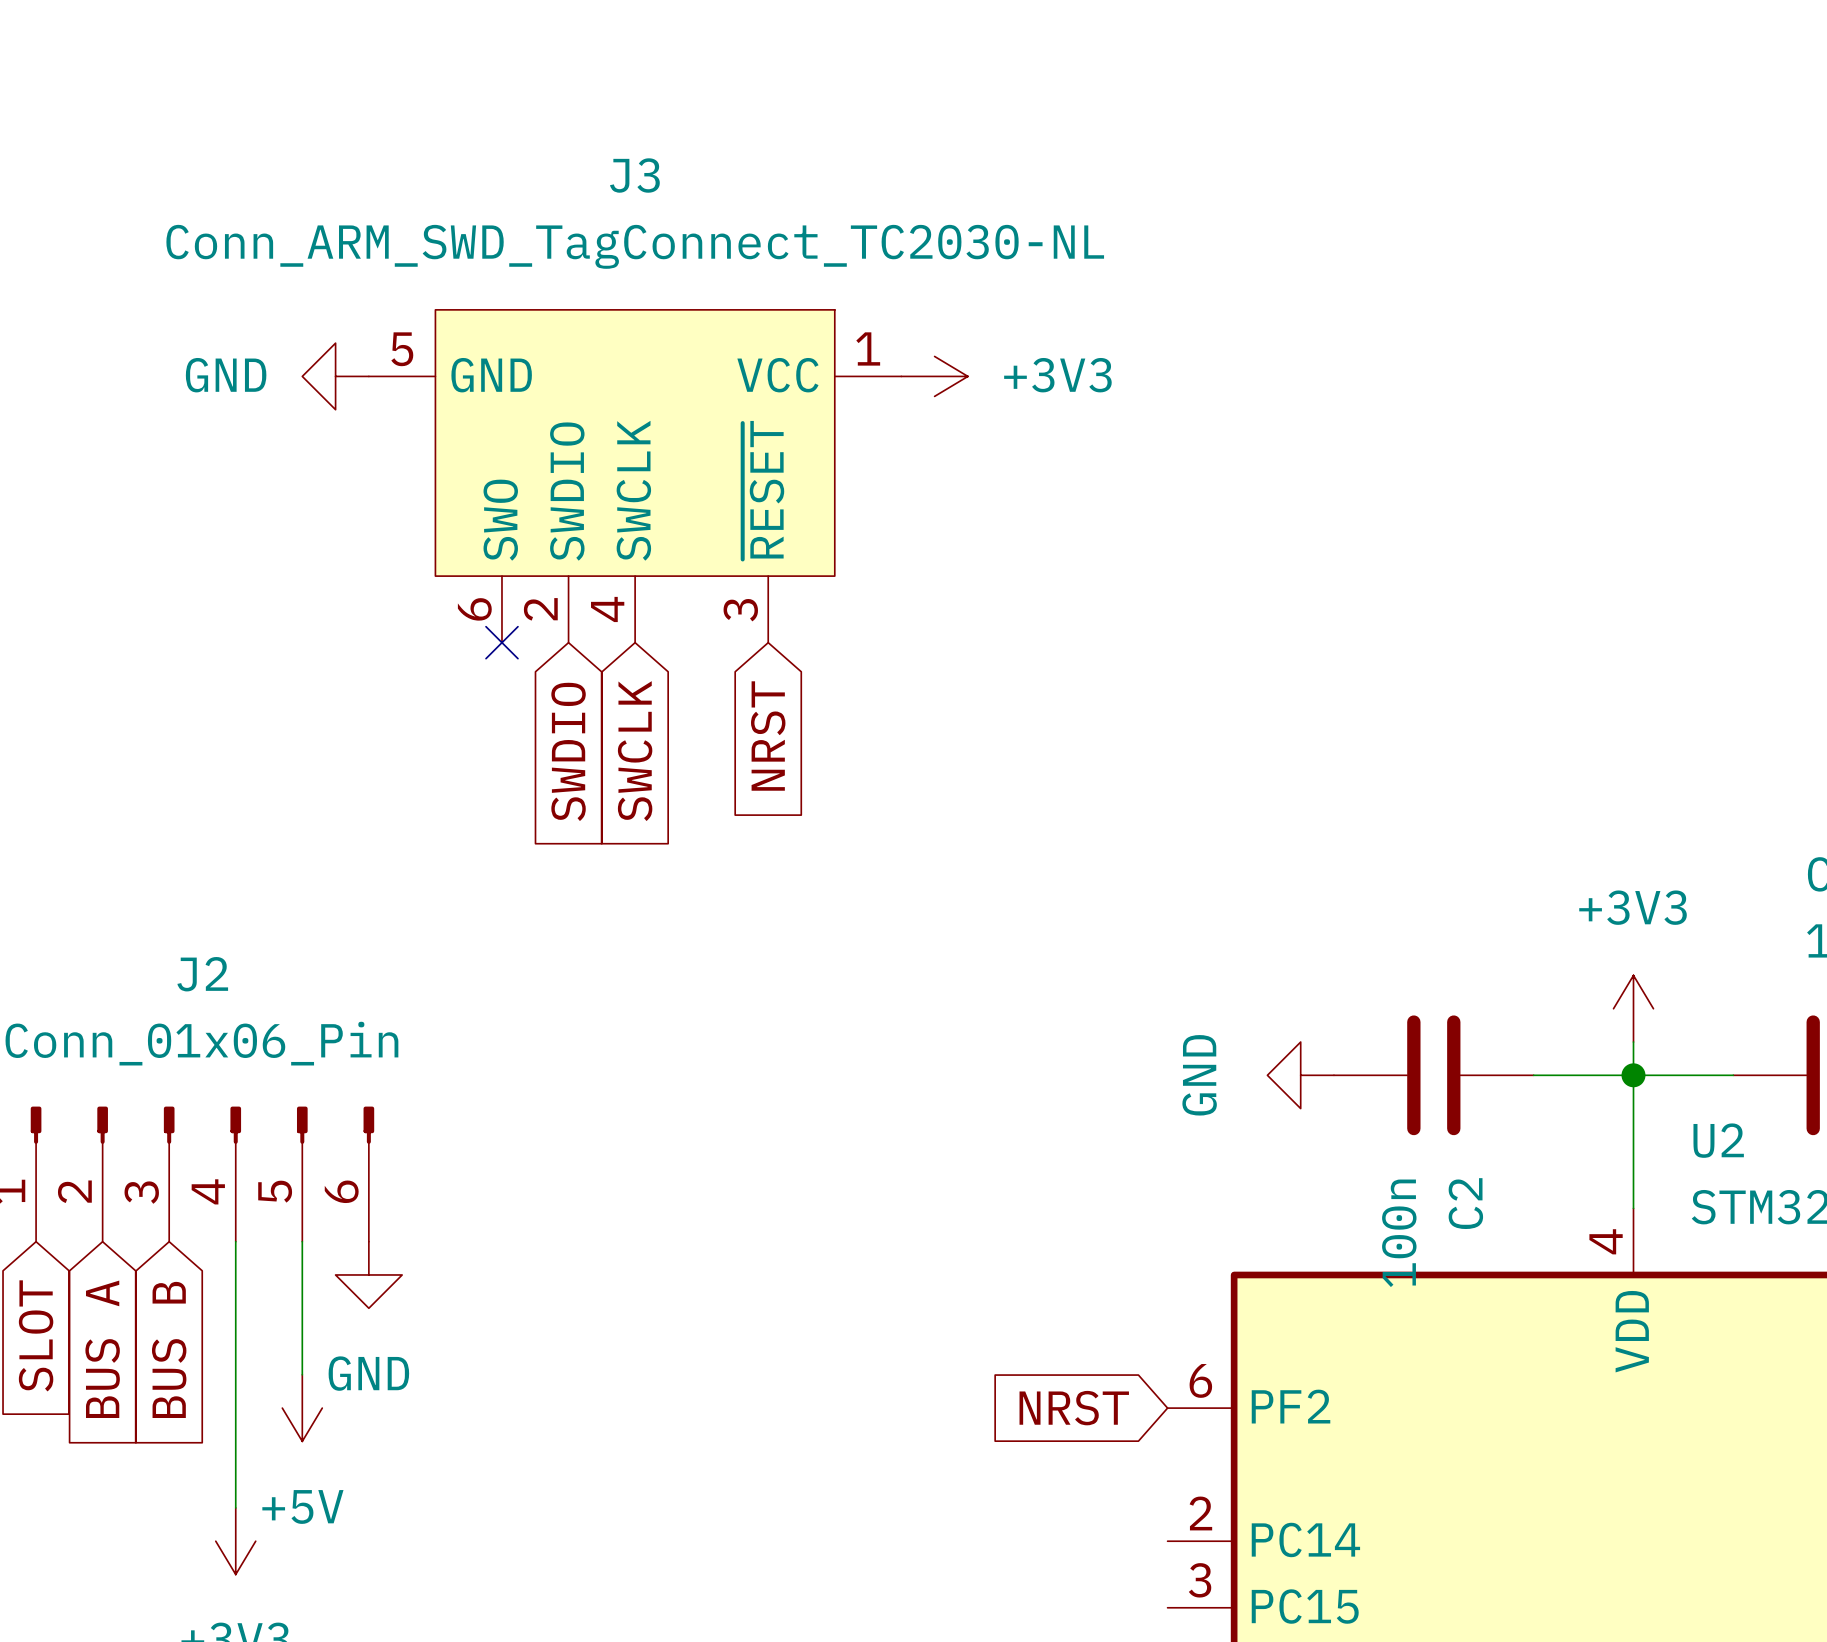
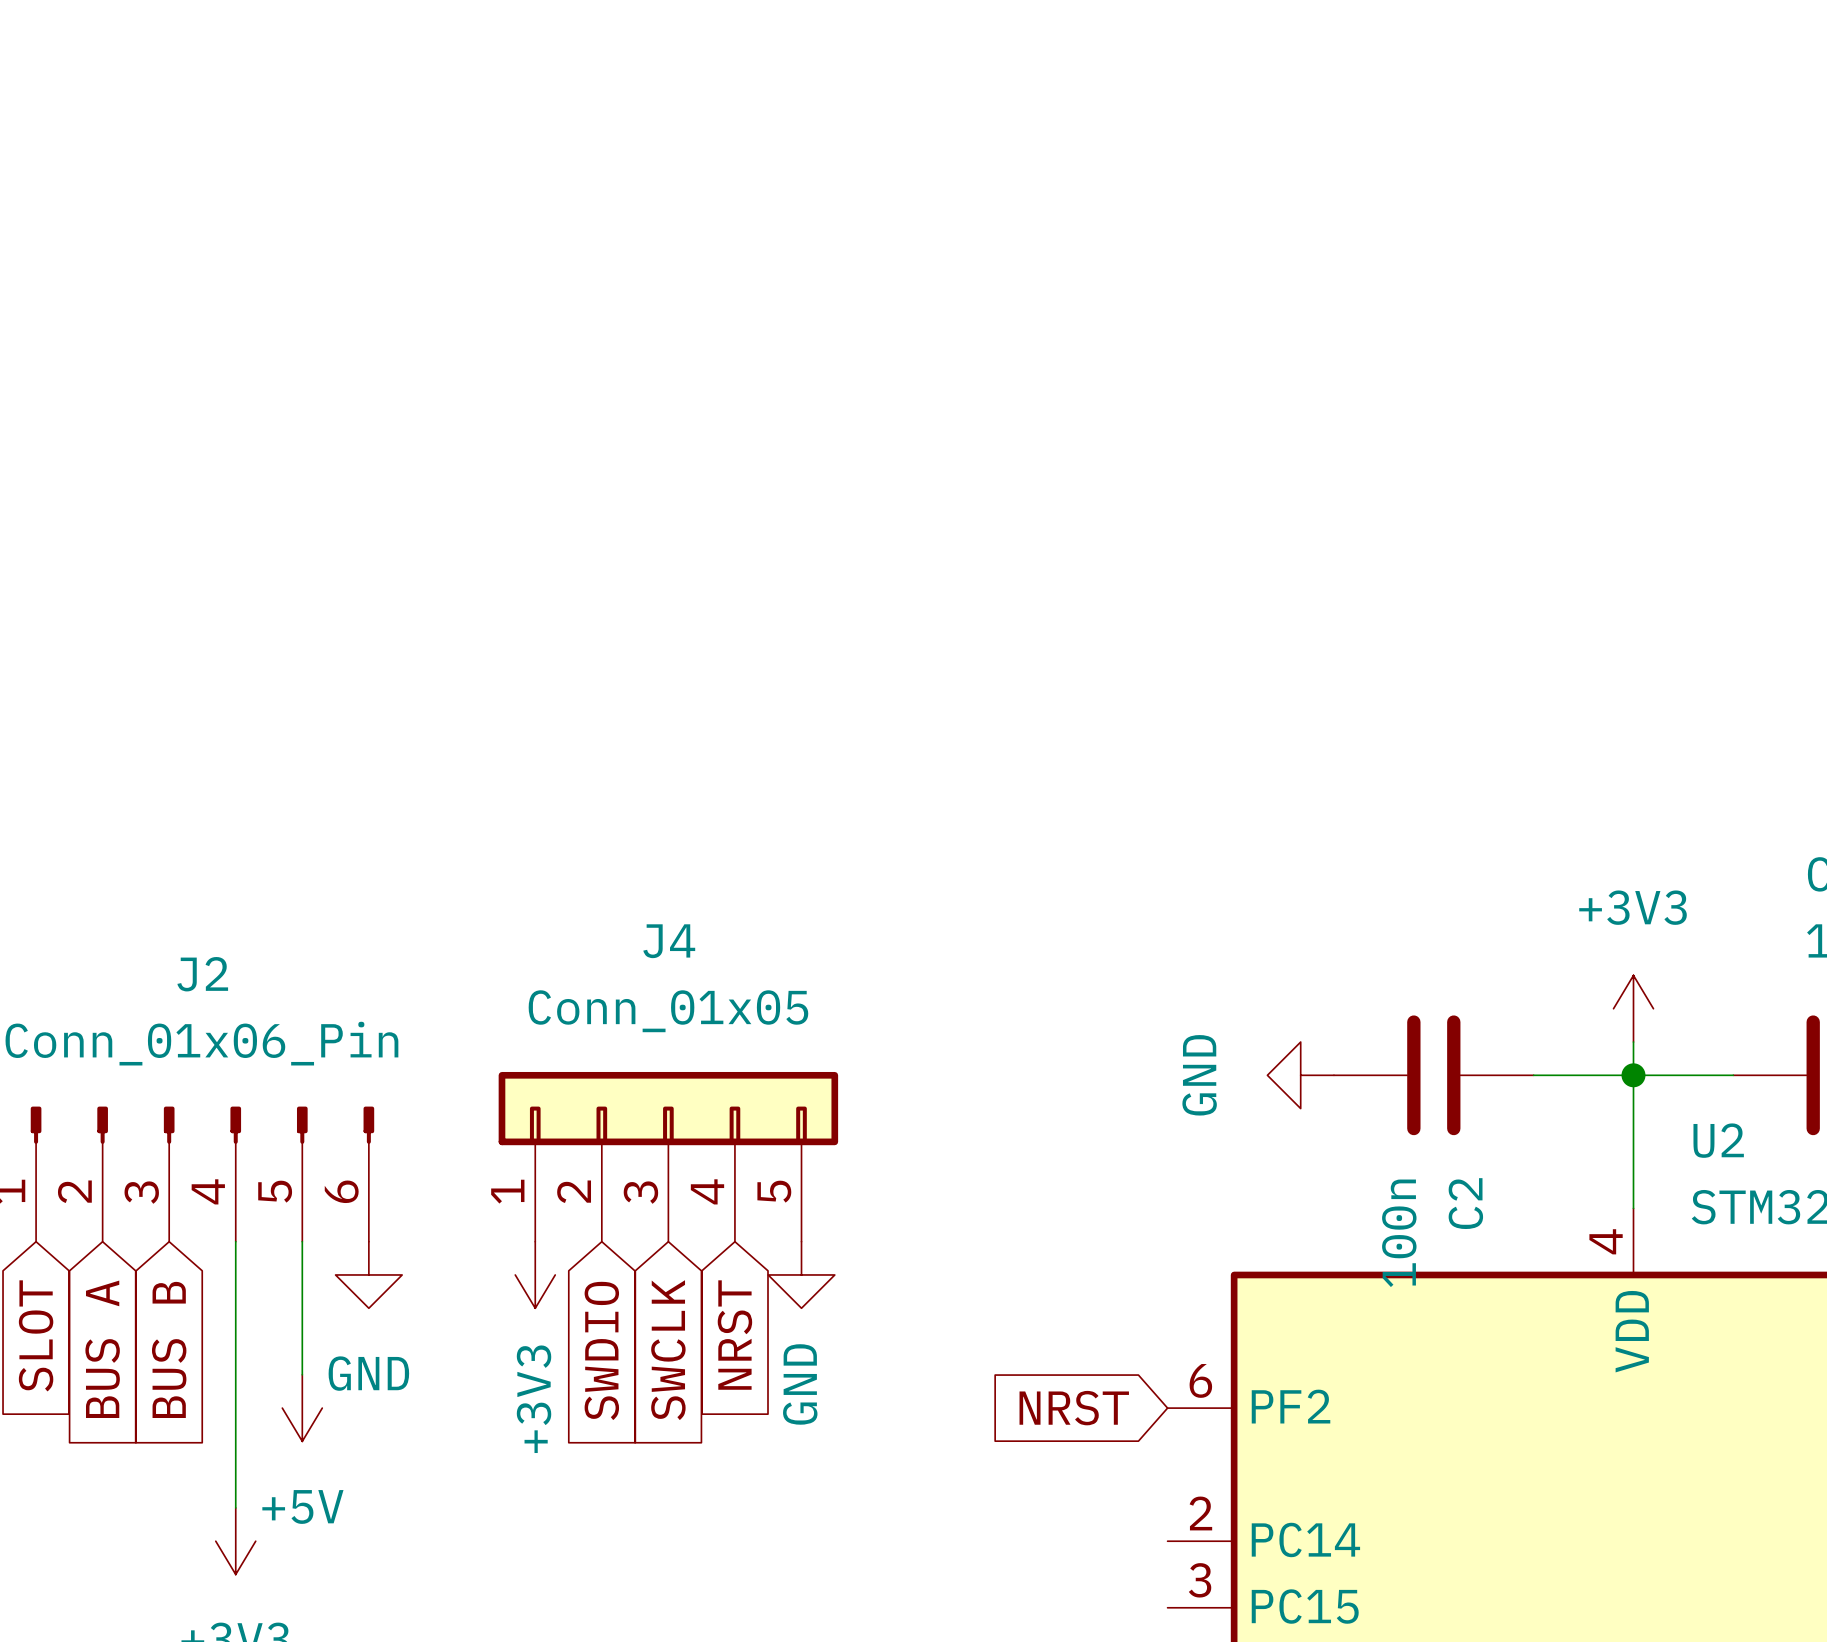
power symbol: GND (335, 376) -> none
power symbol: +3V3 (934, 376) -> none
J3: Conn_ARM_SWD_TagConnect_TC2030-NL (635, 476) -> none
no-connect mark: (501, 642) -> none
global label position: NRST (768, 736) -> NRST (734, 1335)
global label position: SWDIO (568, 751) -> SWDIO (601, 1350)
global label position: SWCLK (635, 751) -> SWCLK (668, 1350)
J4: none -> Conn_01x05 (668, 1156)
power symbol: none -> +3V3 (535, 1274)
power symbol: none -> GND (801, 1274)

